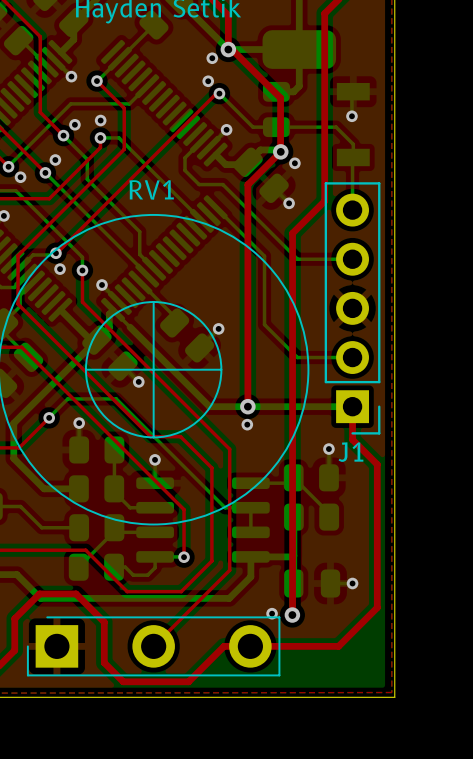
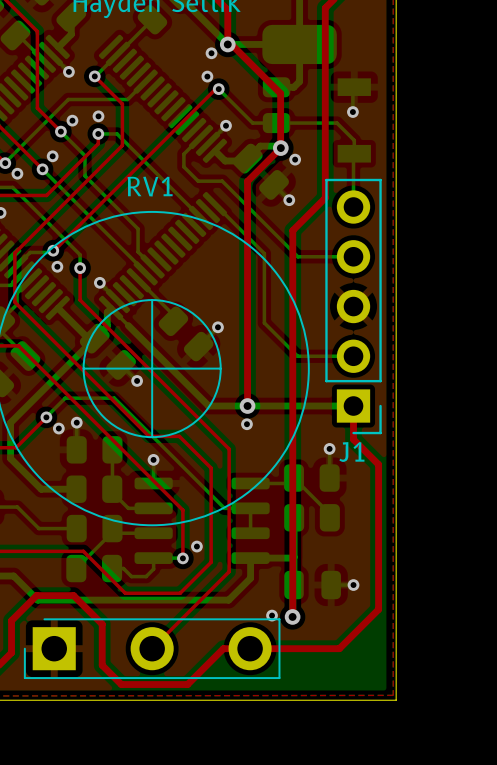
via: none -> (58, 428)
via: none -> (196, 546)

